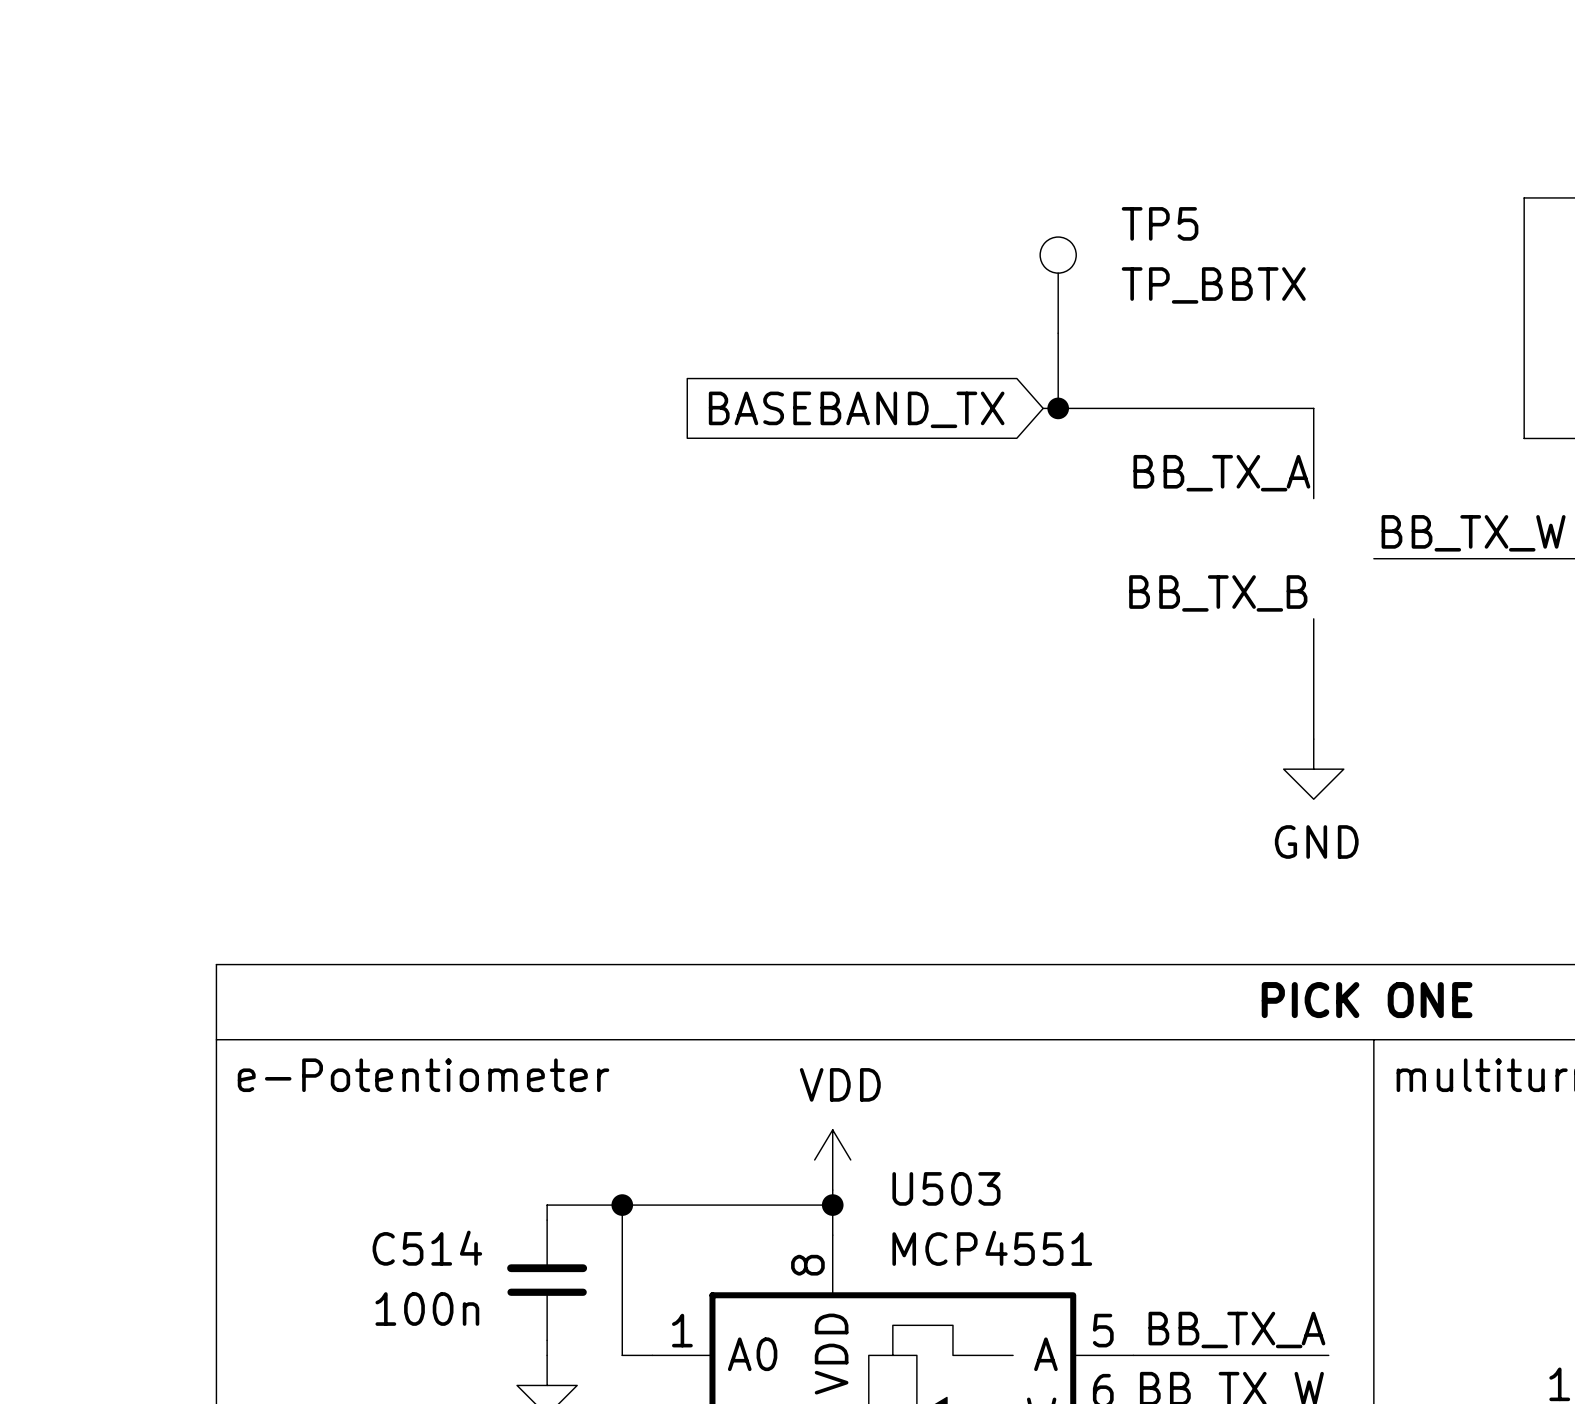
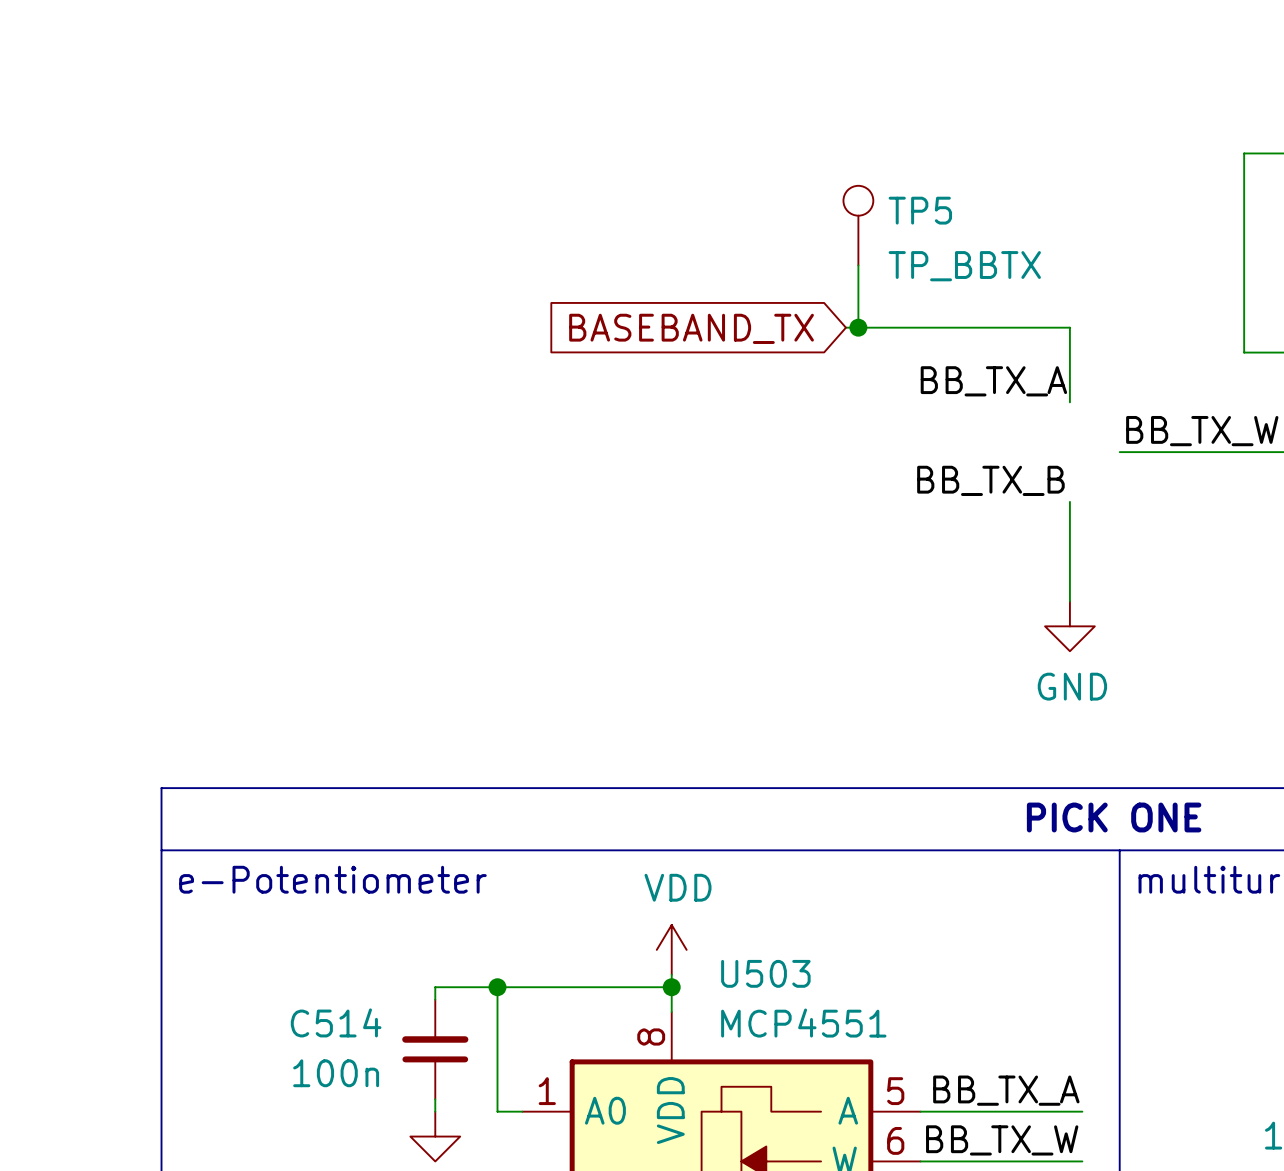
TP5 name position: TP5 (1160, 223) -> TP5 (920, 210)
TP5 value position: TP_BBTX (1213, 285) -> TP_BBTX (964, 266)

